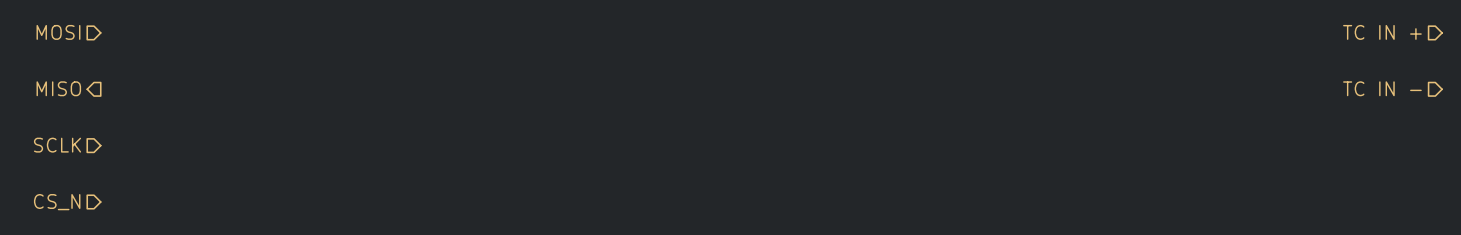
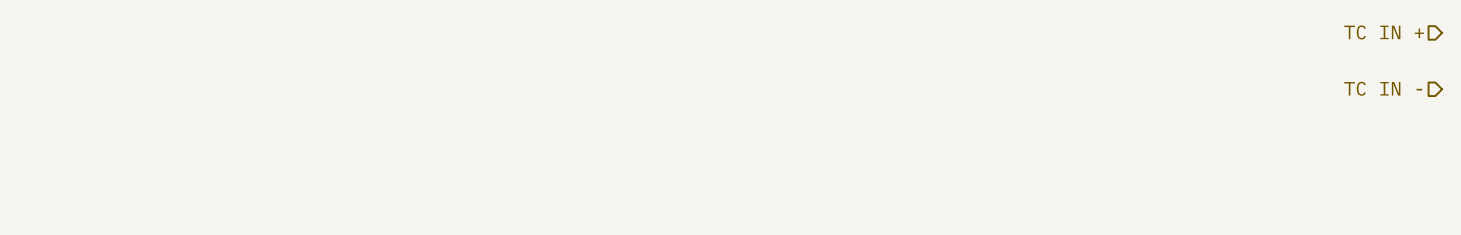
hierarchical label: MOSI (58, 32) -> none
hierarchical label: MISO (58, 88) -> none
hierarchical label: SCLK (57, 145) -> none
hierarchical label: CS_N (57, 202) -> none

